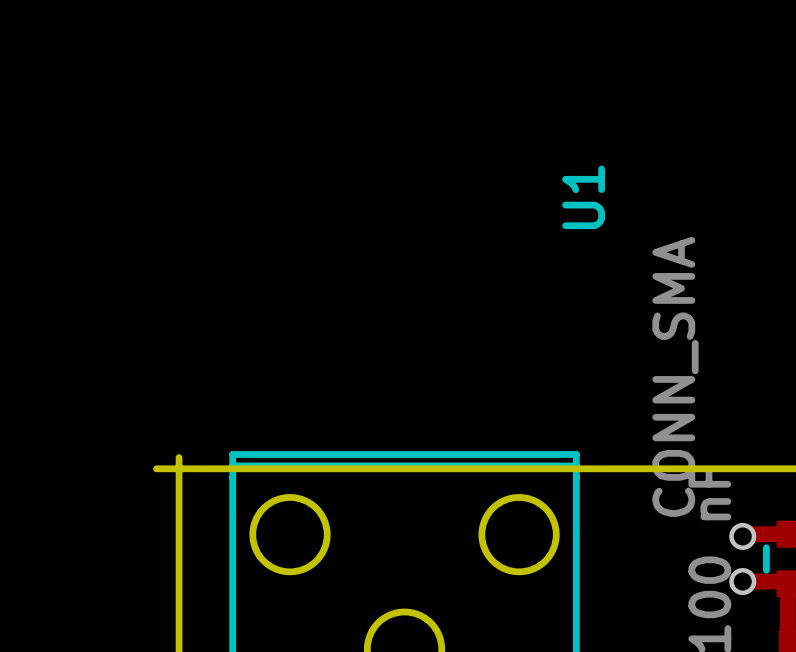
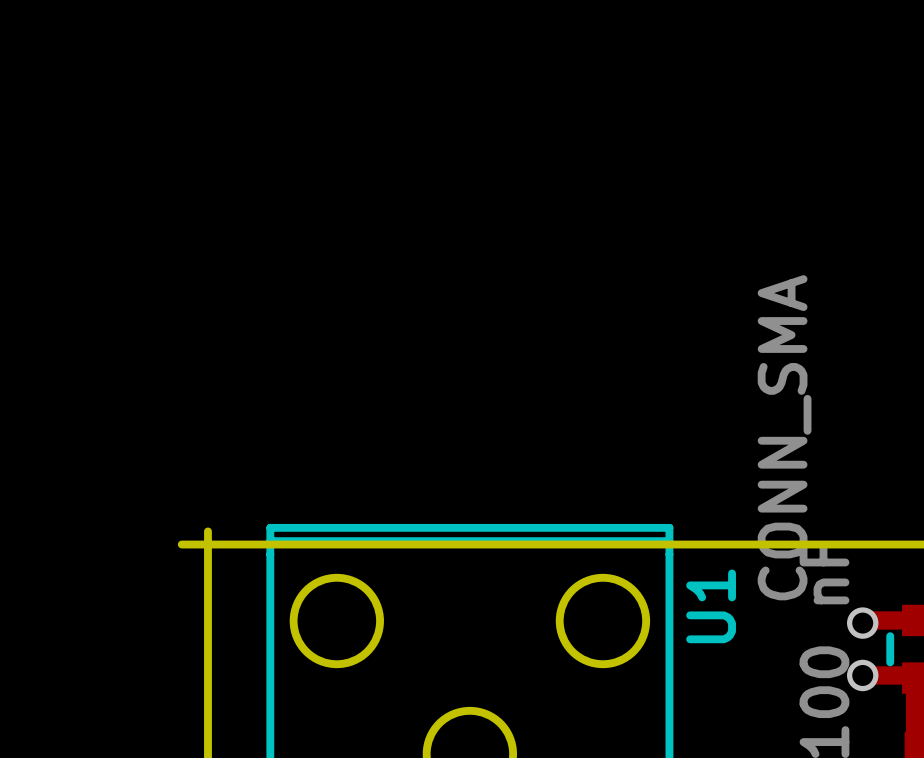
U1 name position: U1 (583, 197) -> U1 (711, 606)

